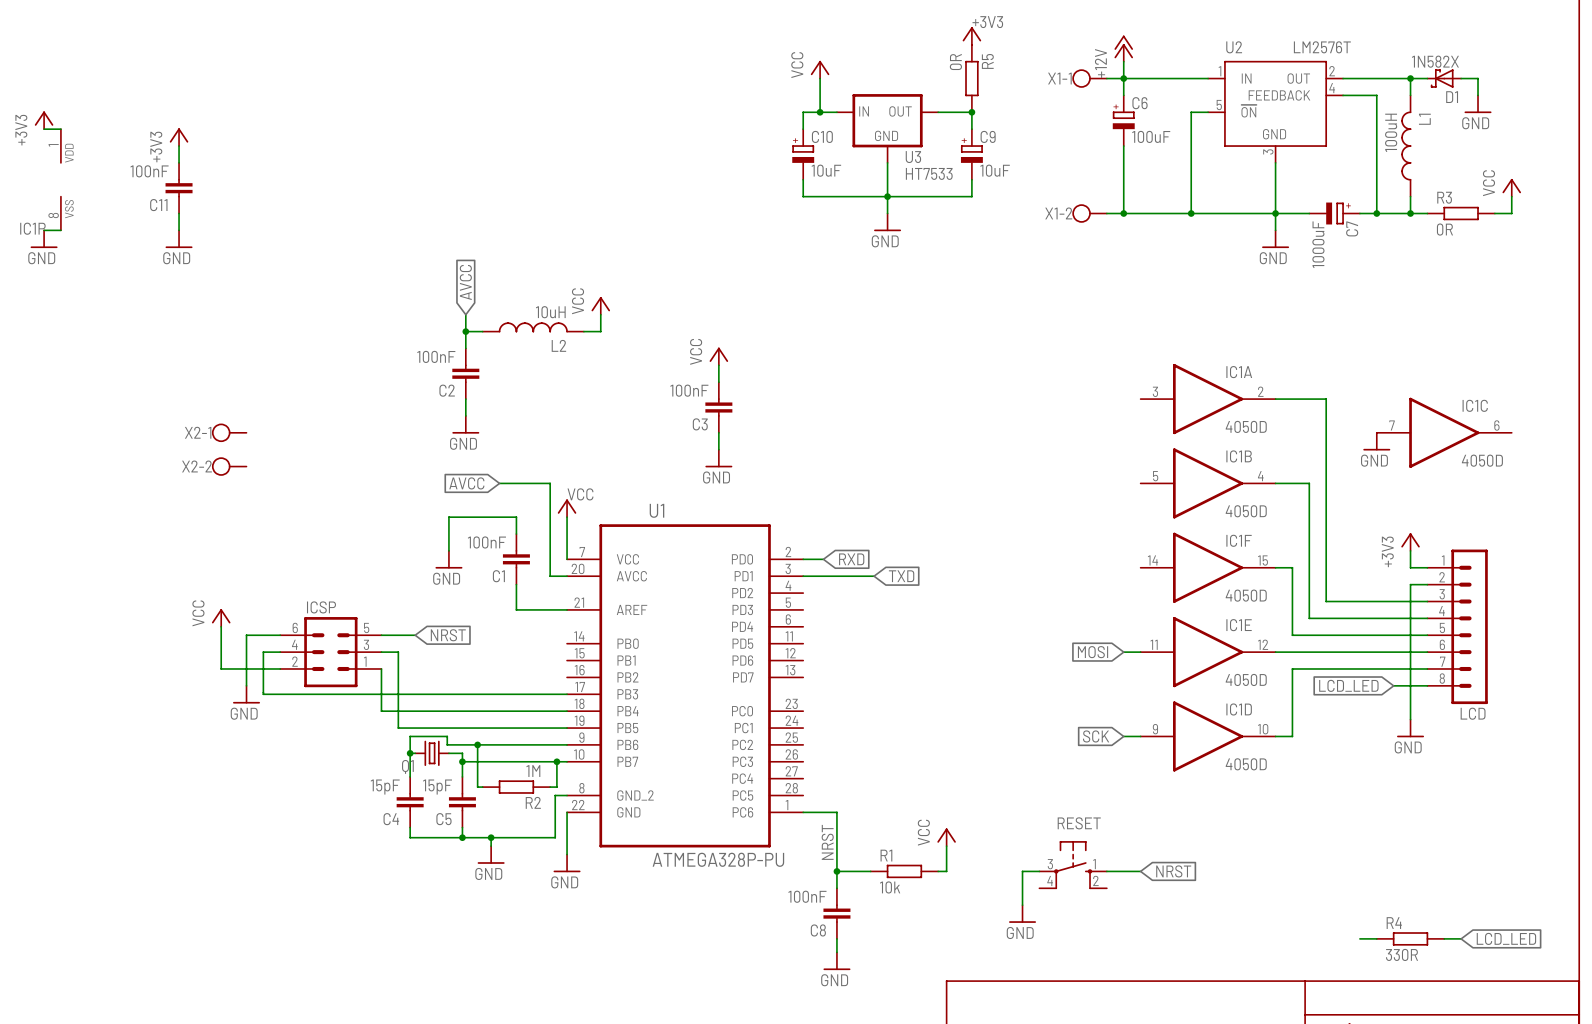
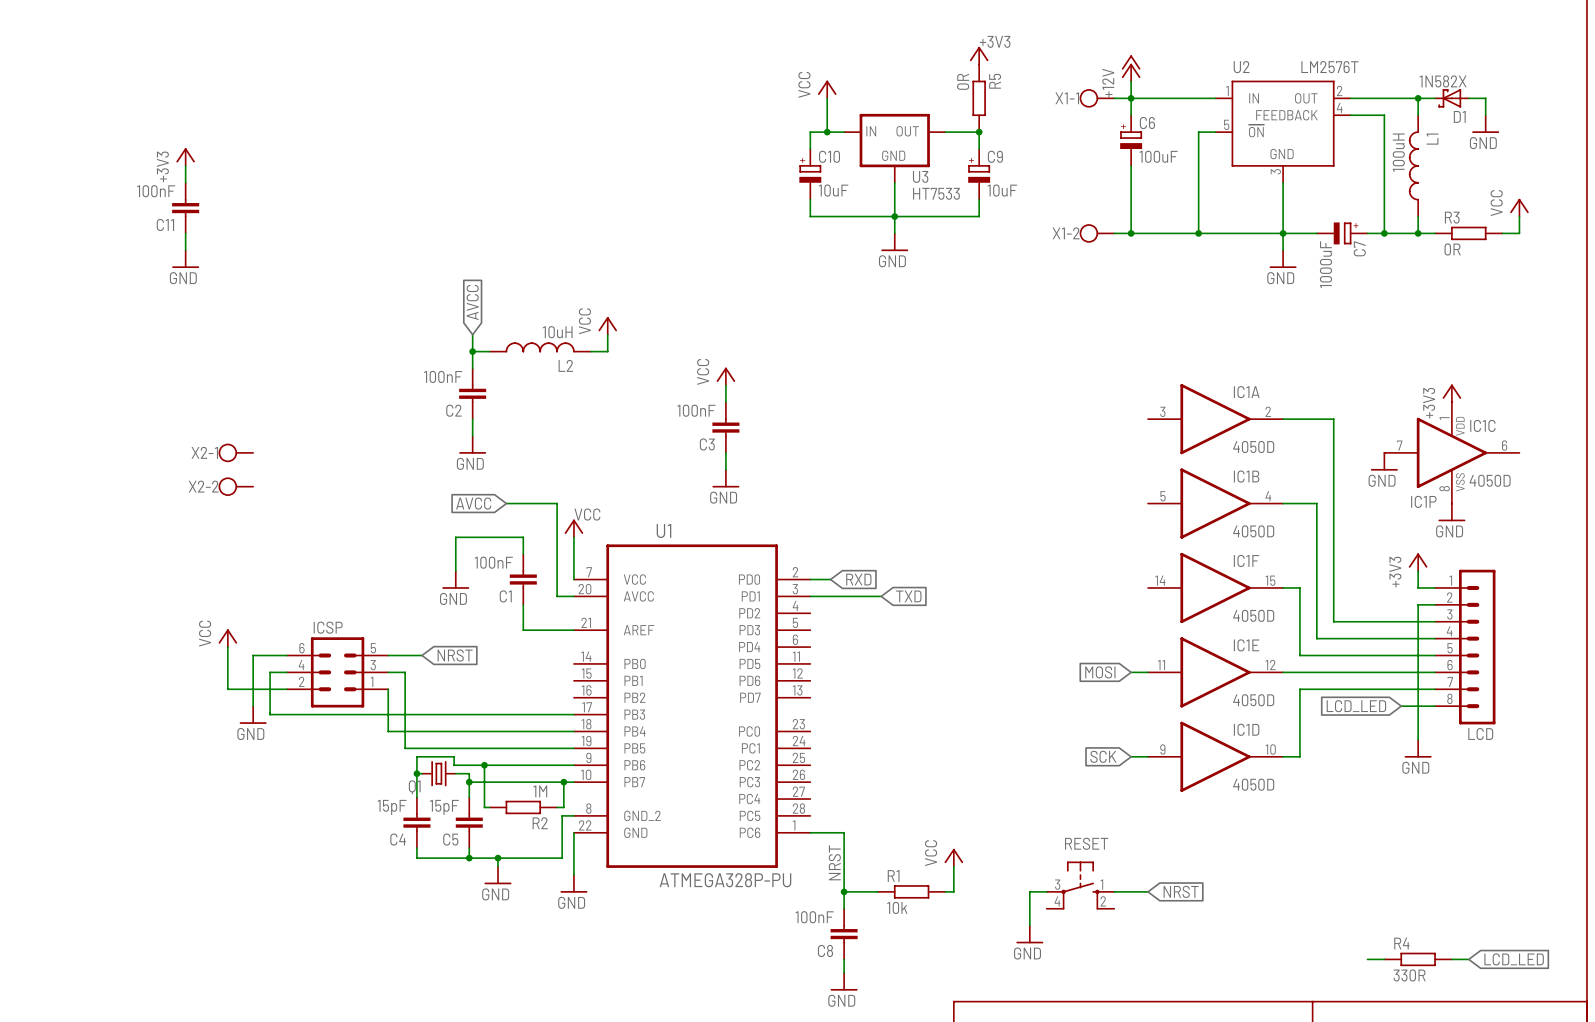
power symbol: +3V3 (44, 120) -> none
wire: (44, 129) (60, 129) -> none
IC1P position: (60, 179) -> (1451, 452)
wire: (44, 230) (60, 230) -> none
power symbol: GND (44, 239) -> none
power symbol: none -> +3V3 (1451, 393)
power symbol: none -> GND (1451, 512)

